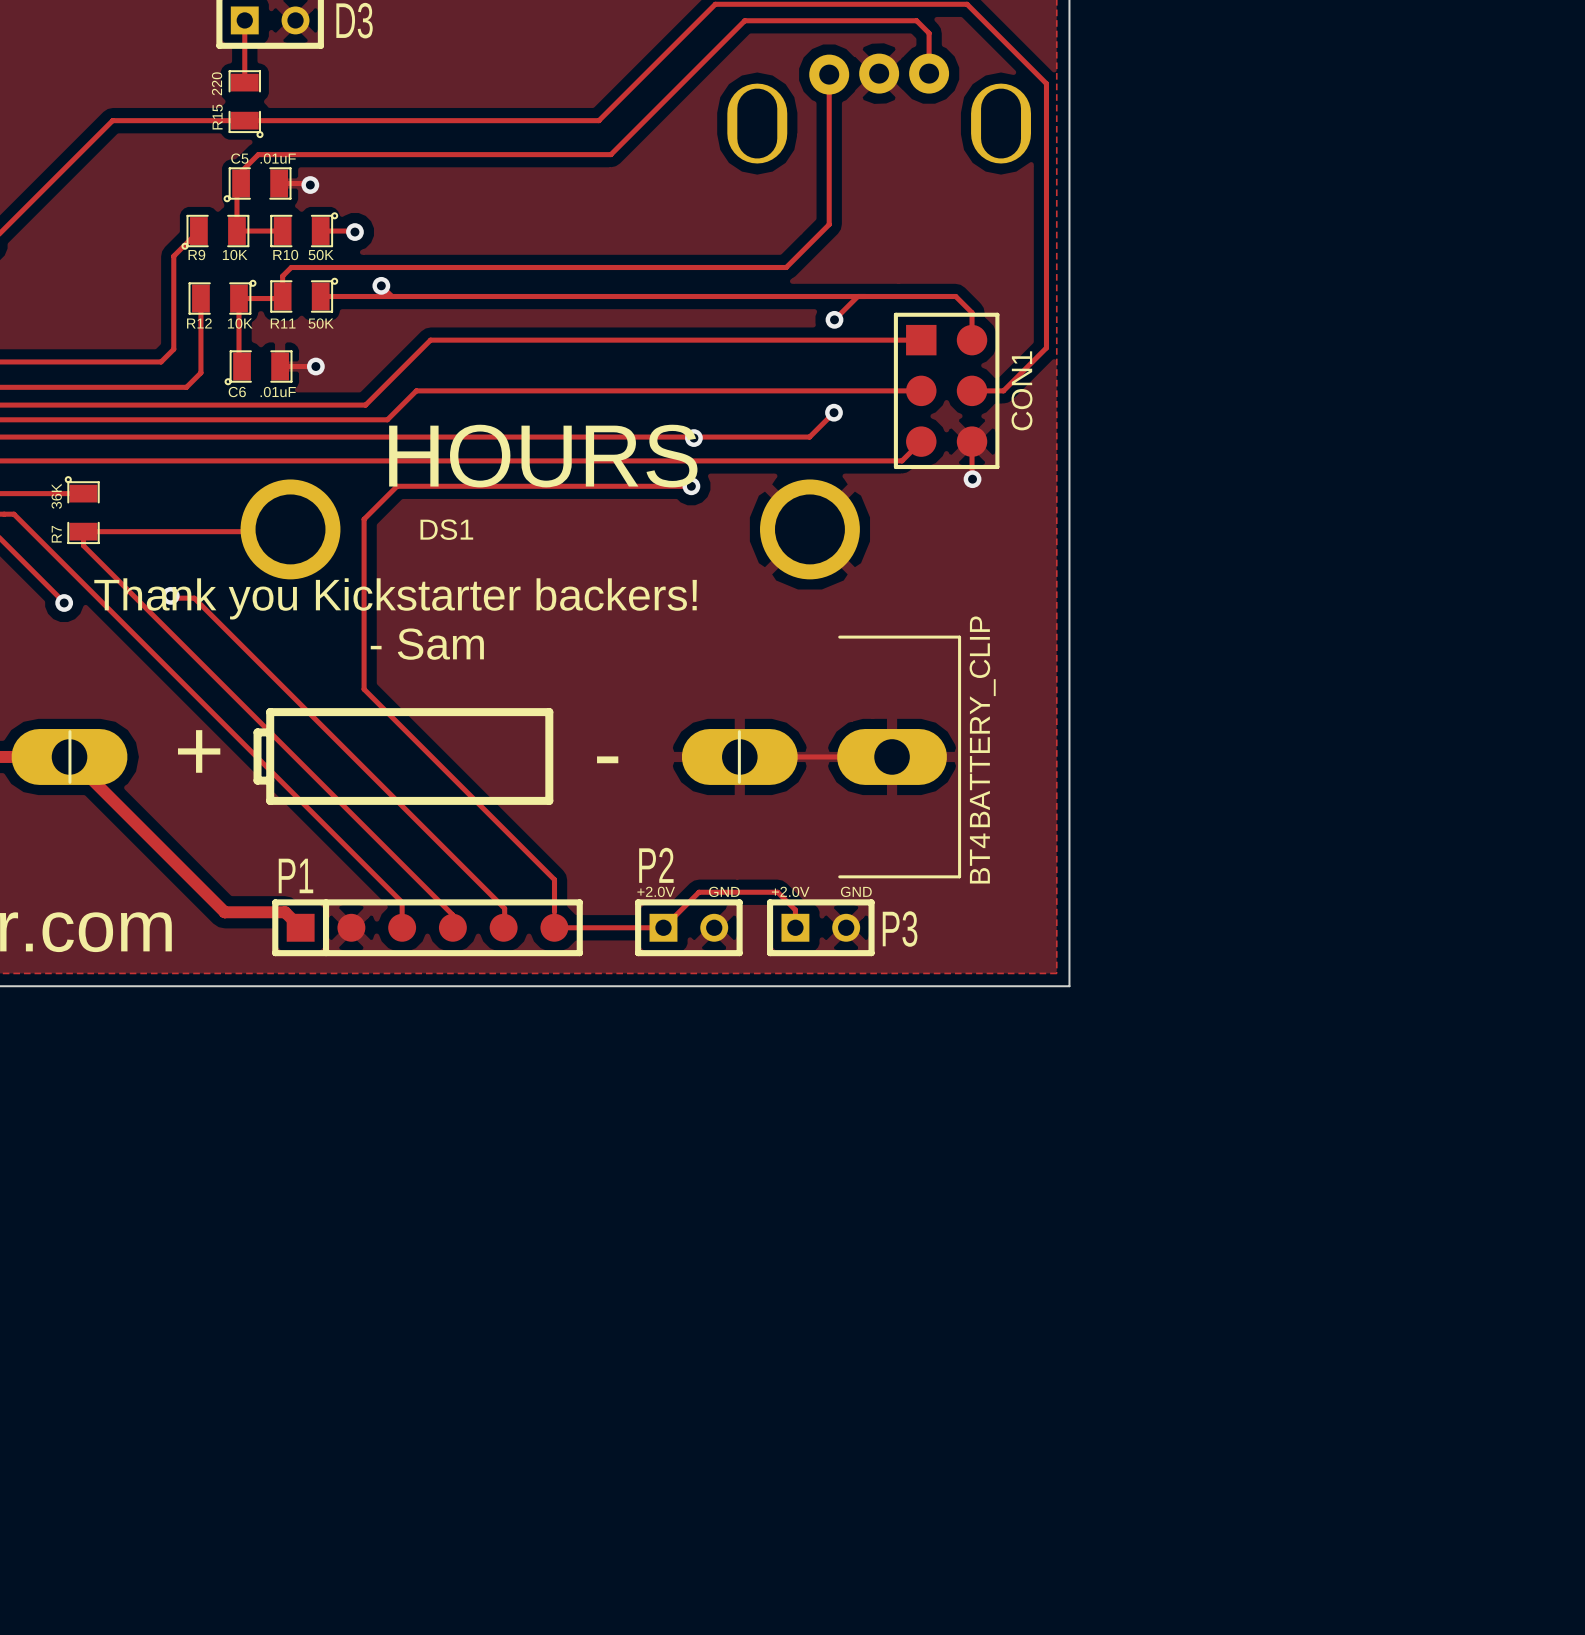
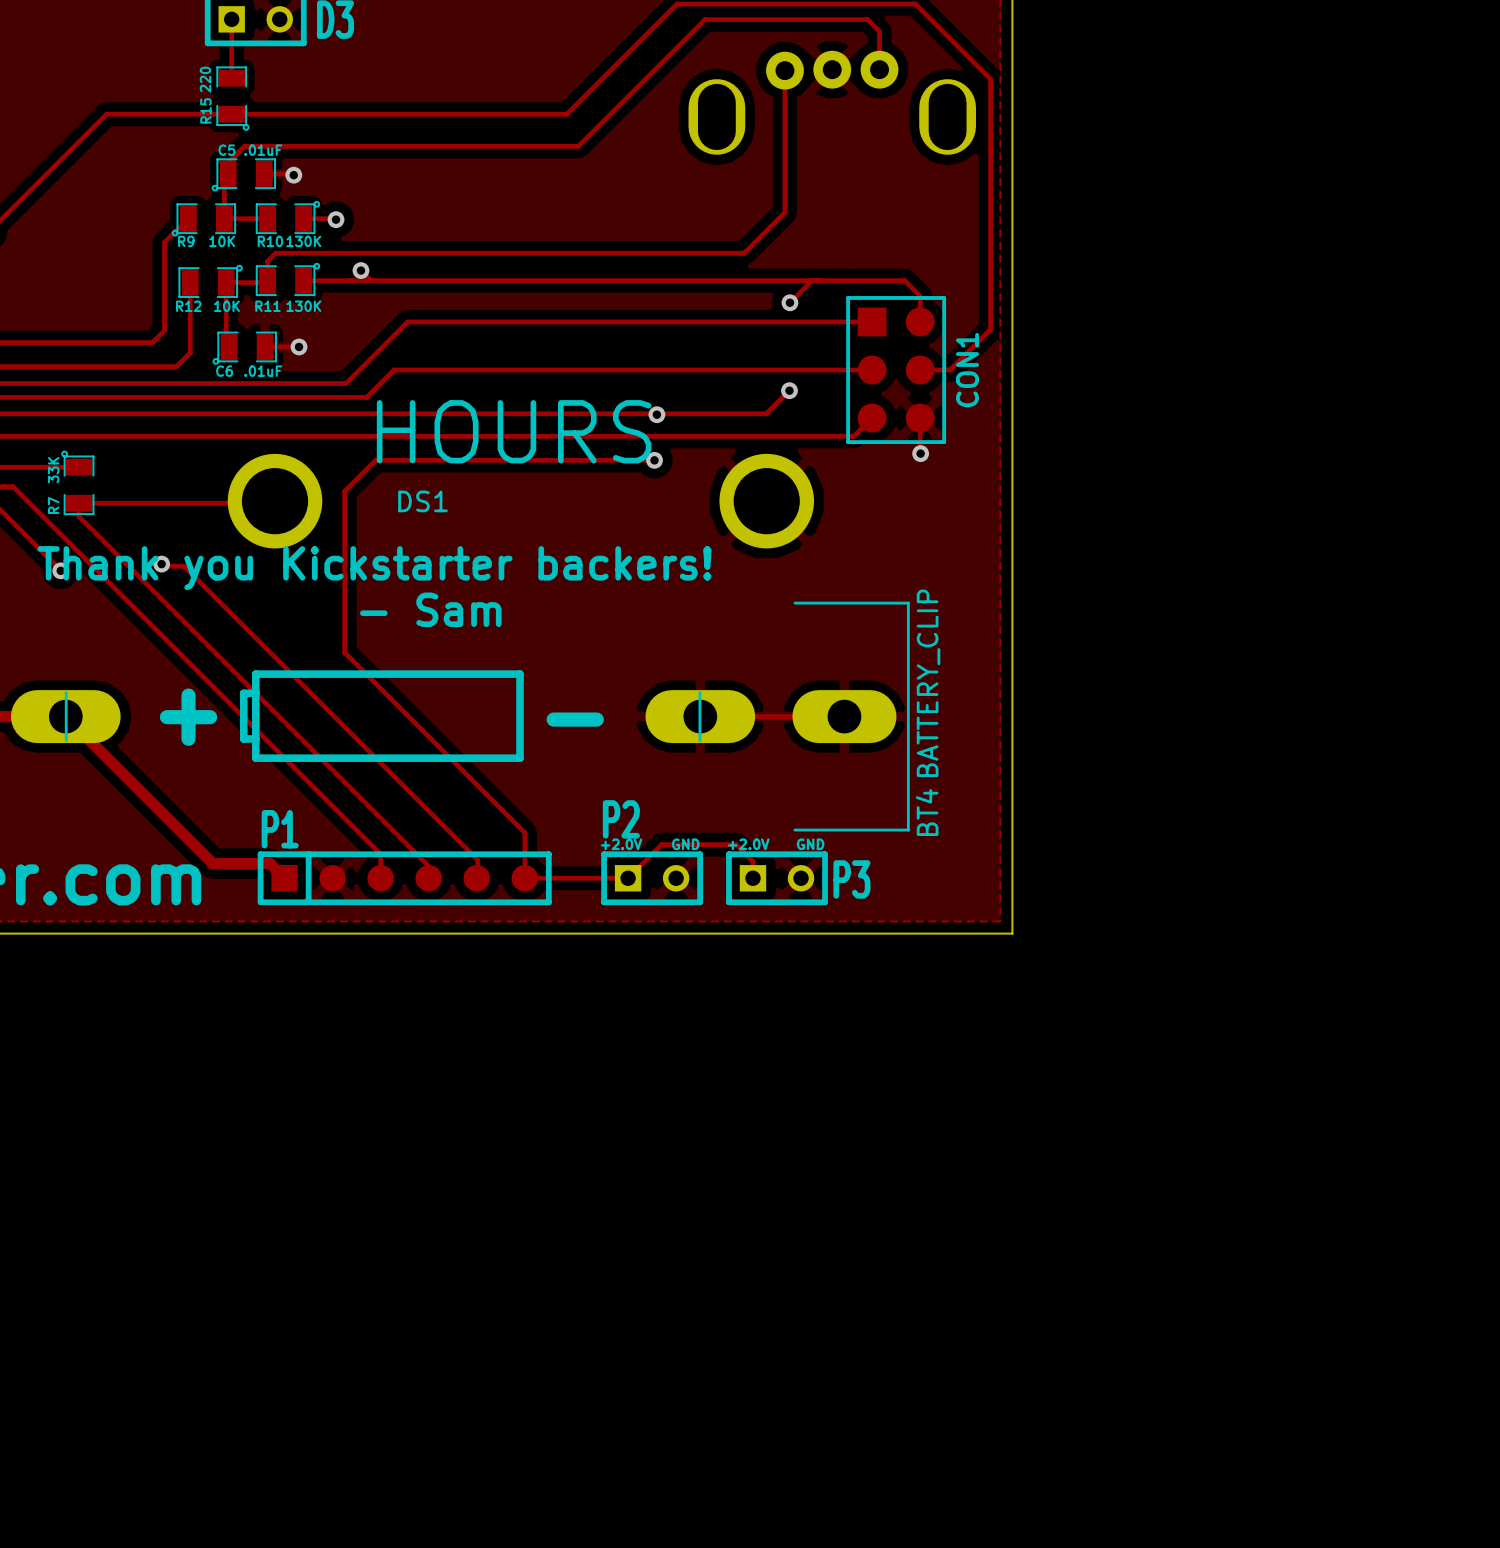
R10 value: 50K (321, 255) -> 130K (303, 241)
R11 value: 50K (321, 323) -> 130K (303, 306)
R7 value: 36K (56, 496) -> 33K (53, 470)

